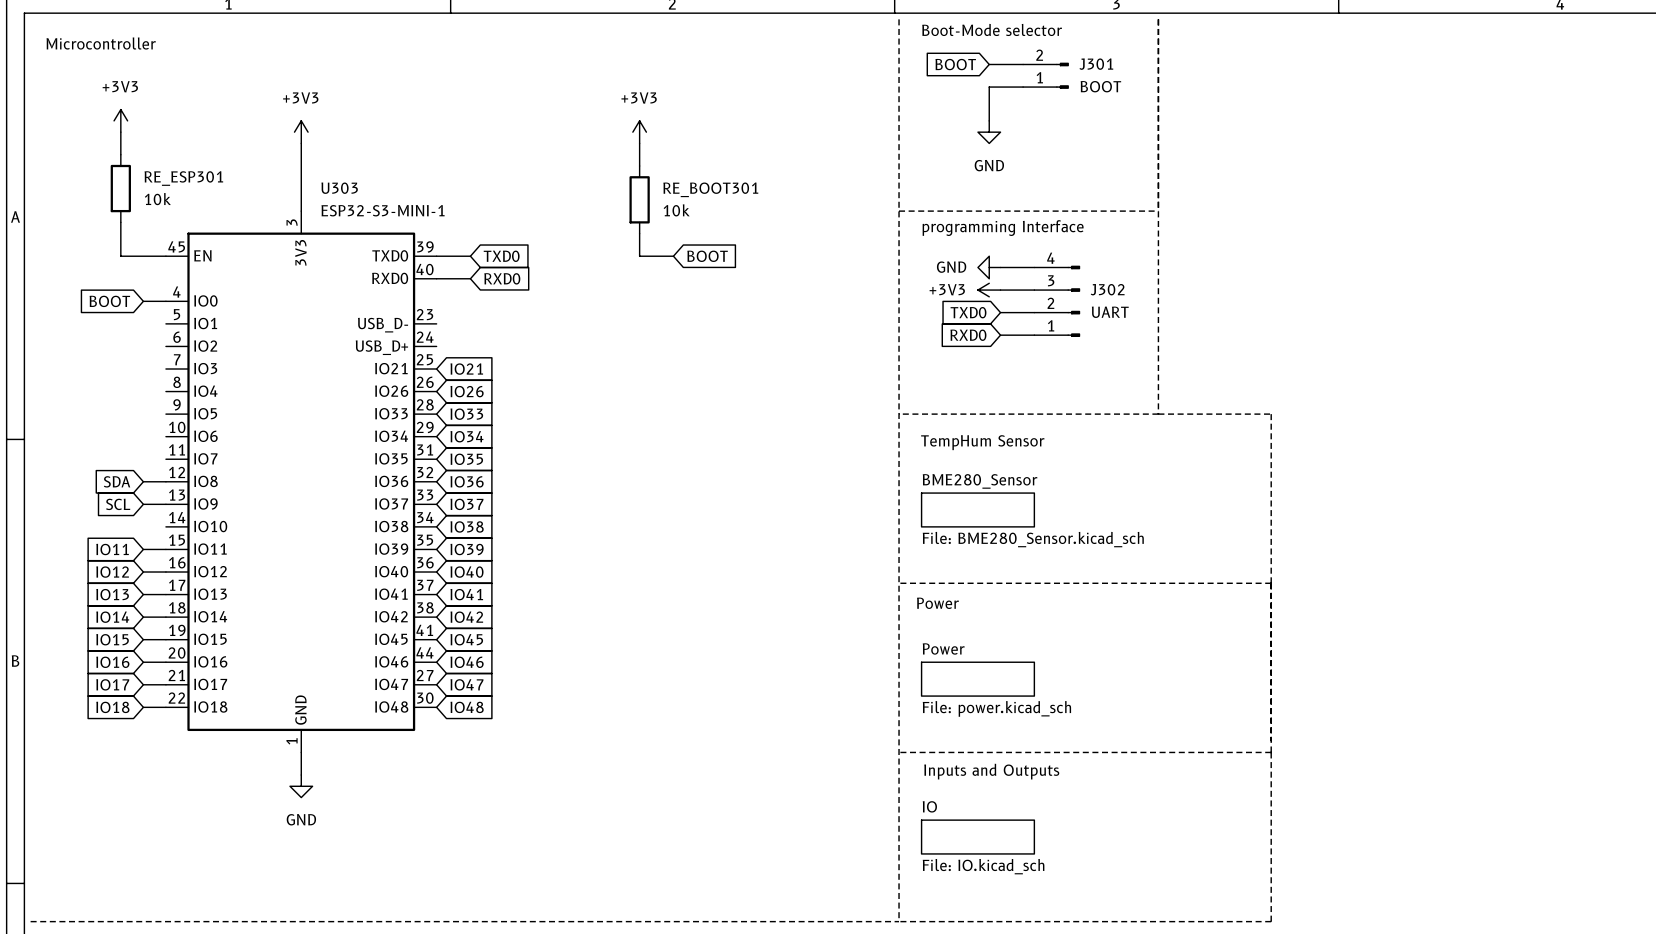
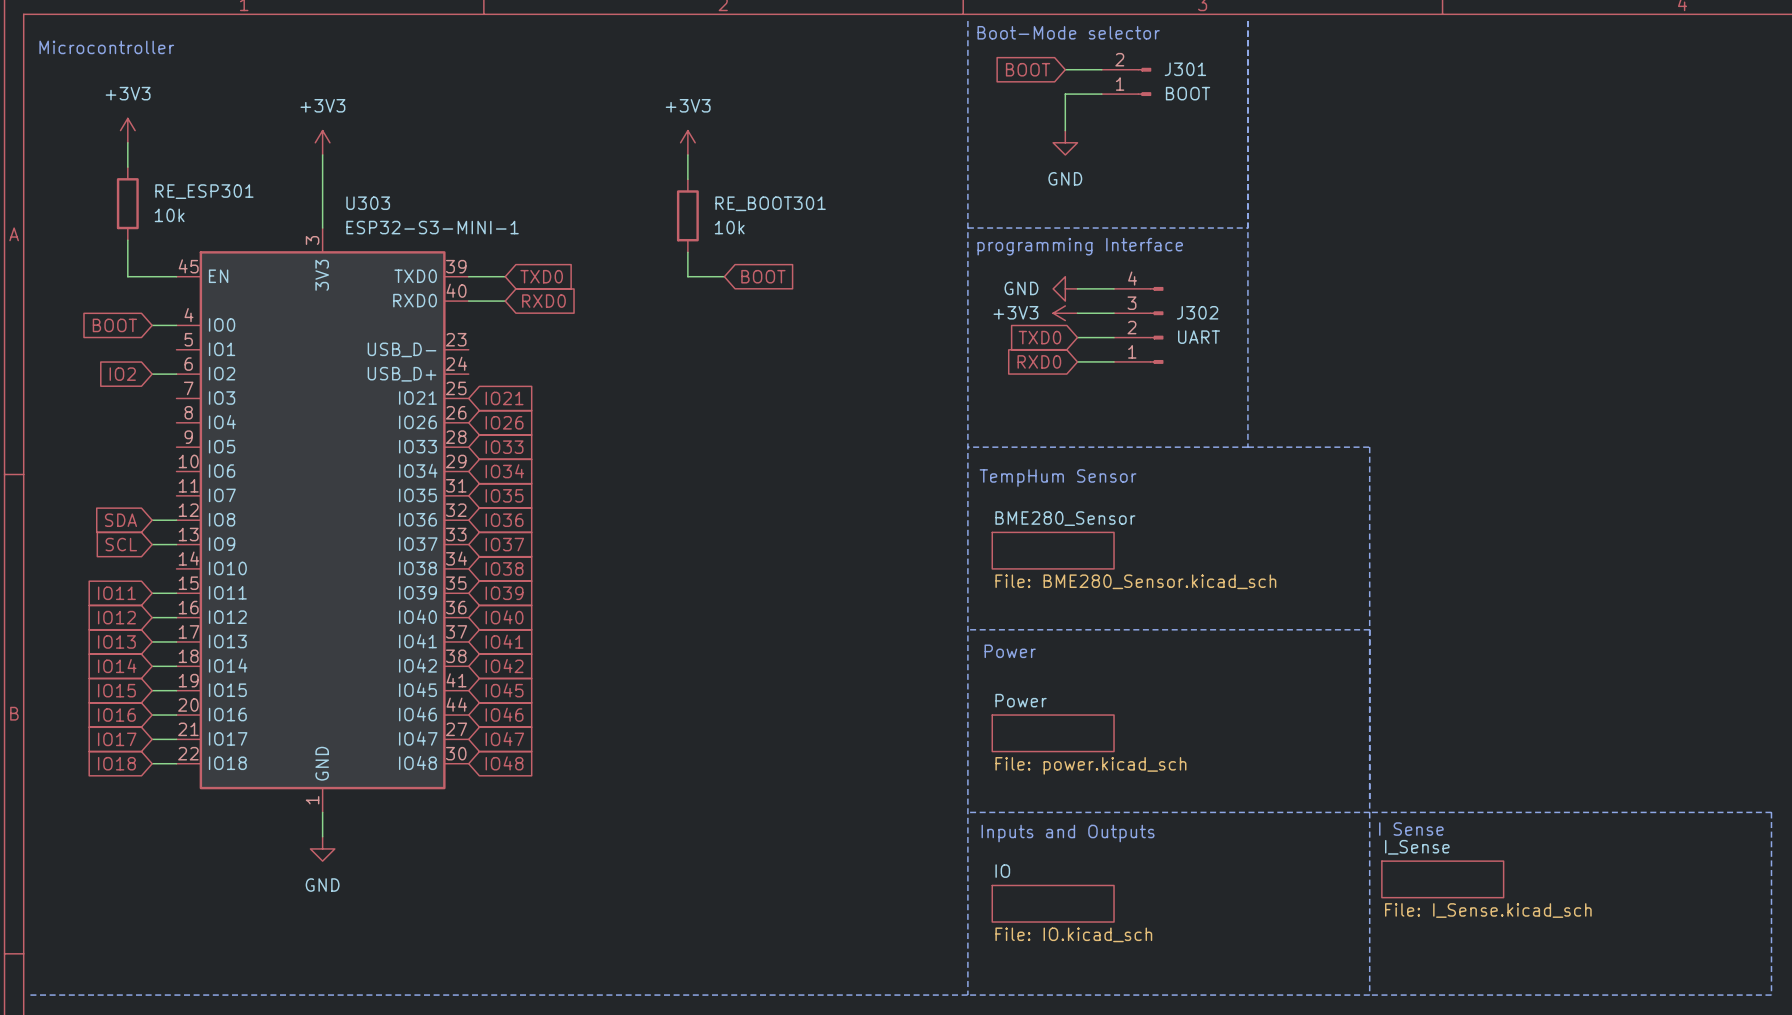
global label: none -> IO2 (122, 374)
wire: none -> (152, 374) (176, 374)
line: none -> (1369, 812) (1771, 812) (1771, 995) (1369, 995)
text: none -> I Sense (1411, 829)
sheet I_Sense: none -> File: I_Sense.kicad_sch (1442, 879)

